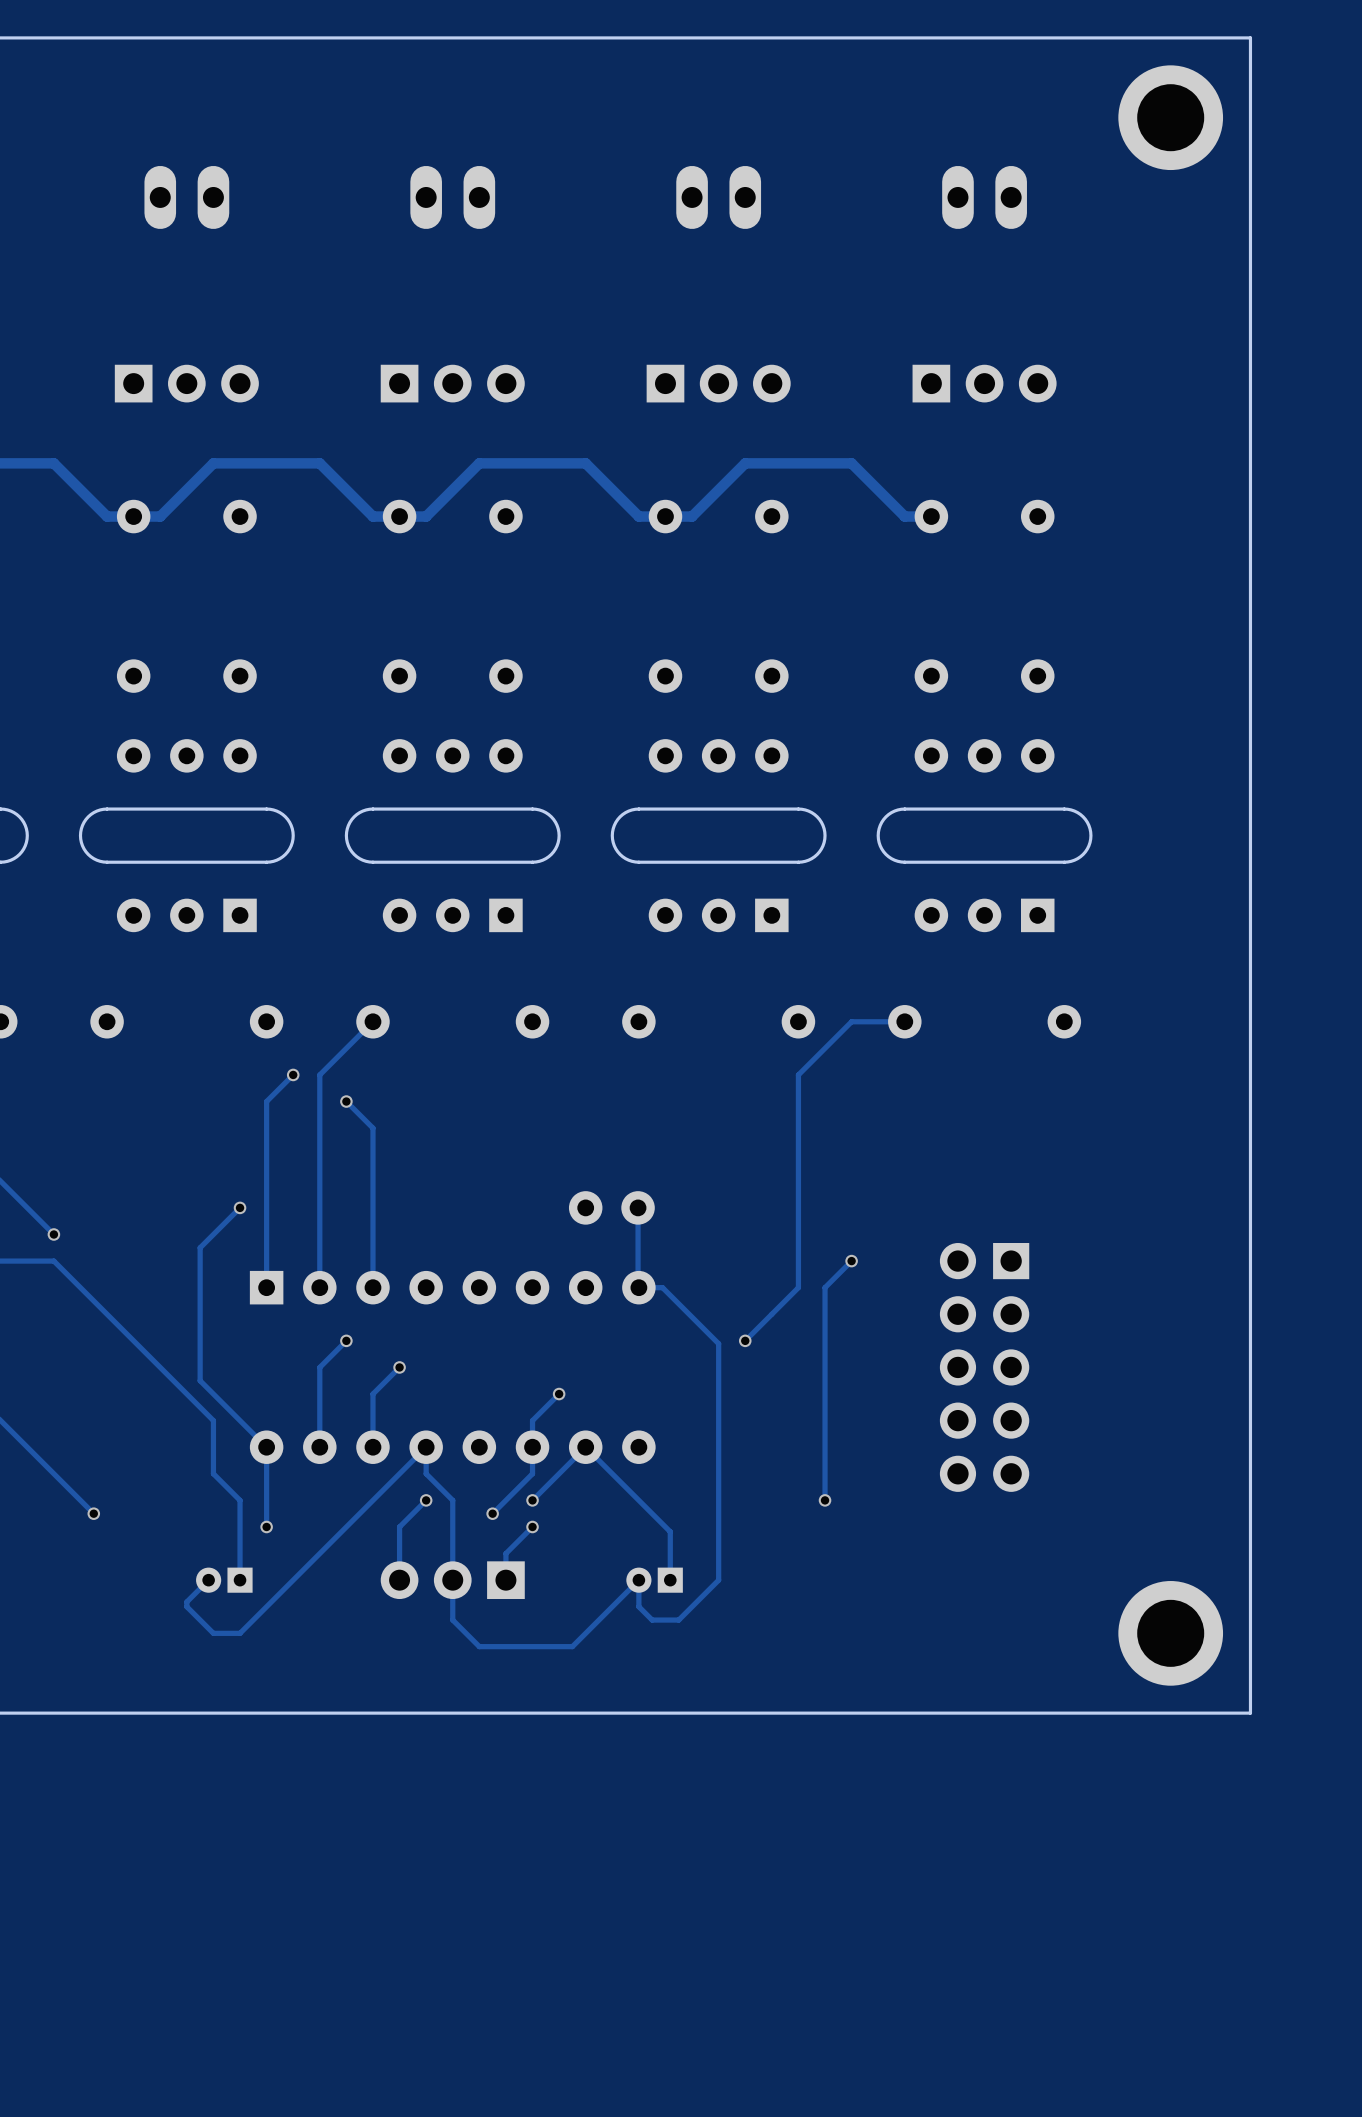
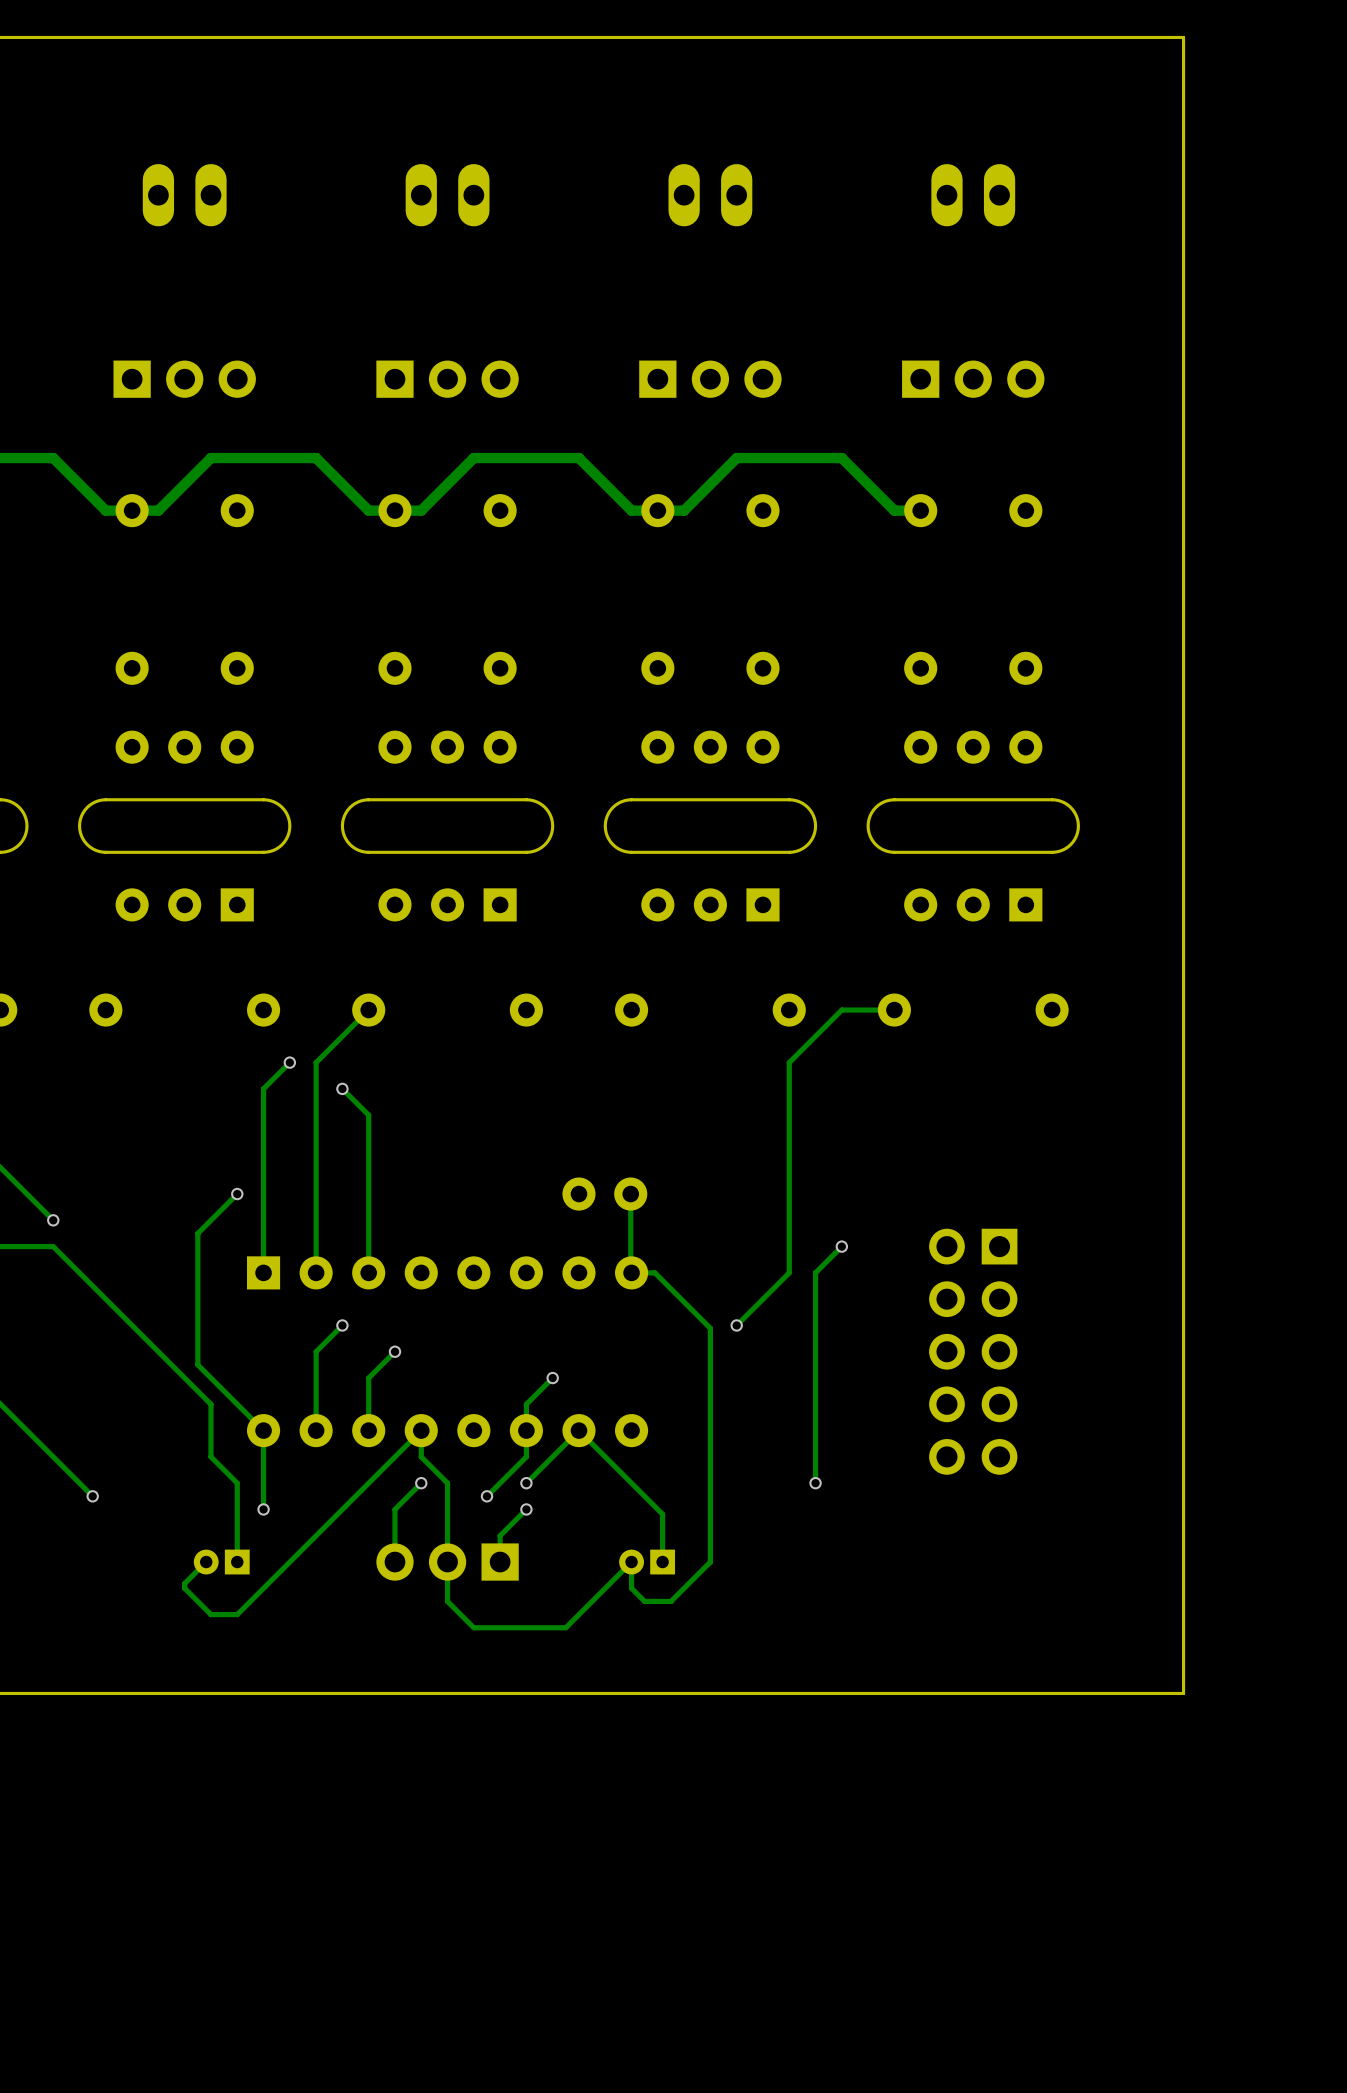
board edge: (1197, 37) (1250, 37) (1250, 1713) (1197, 1713) -> (1183, 37) (1183, 1693)
part: (1170, 117) -> none
part: (1170, 1633) -> none

